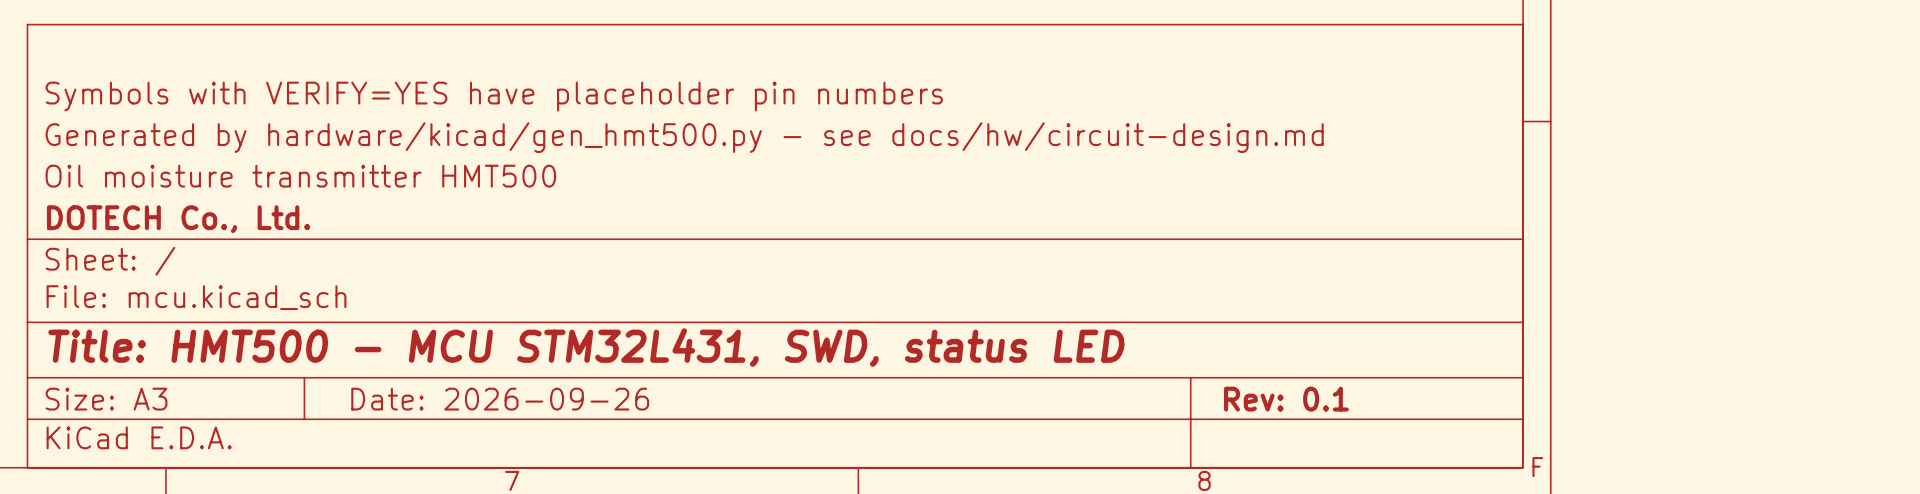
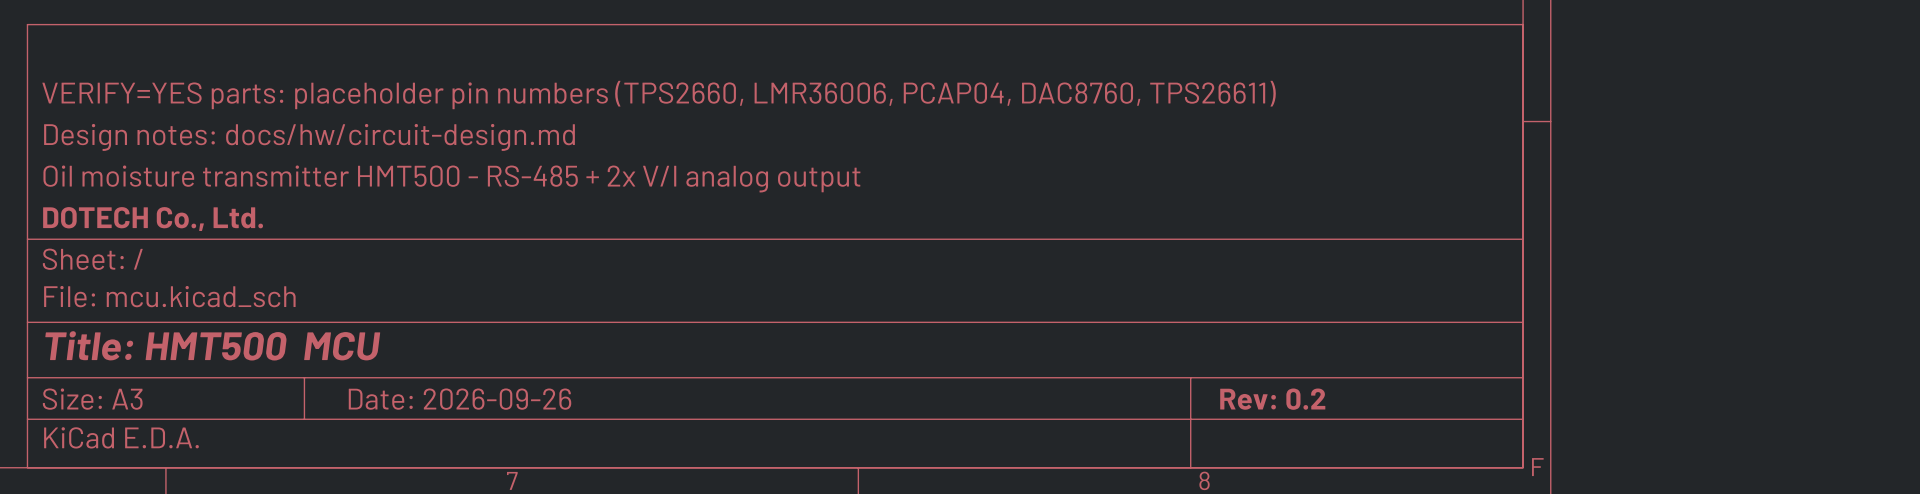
title block: Symbols with VERIFY=YES have placeholder pin numbers (494, 96) -> VERIFY=YES parts: placeholder pin numbers (TPS2660, LMR36006, PCAP04, DAC8760, TPS26611) (659, 95)
title block: Generated by hardware/kicad/gen_hmt500.py - see docs/hw/circuit-design.md (684, 137) -> Design notes: docs/hw/circuit-design.md (309, 137)
title block: Oil moisture transmitter HMT500 (300, 176) -> Oil moisture transmitter HMT500 - RS-485 + 2x V/I analog output (451, 178)
title block: Title: HMT500 - MCU STM32L431, SWD, status LED (586, 347) -> Title: HMT500 MCU (212, 345)
title block: Rev: 0.1 (1286, 399) -> Rev: 0.2 (1272, 399)

